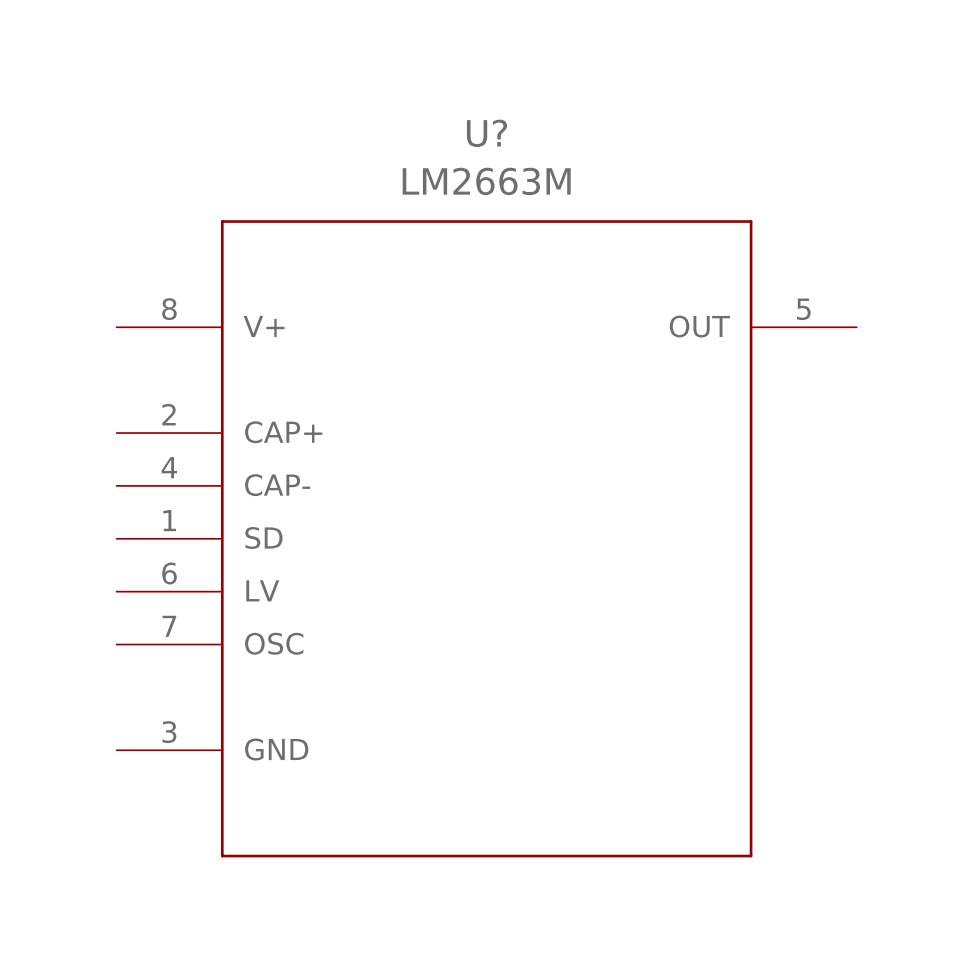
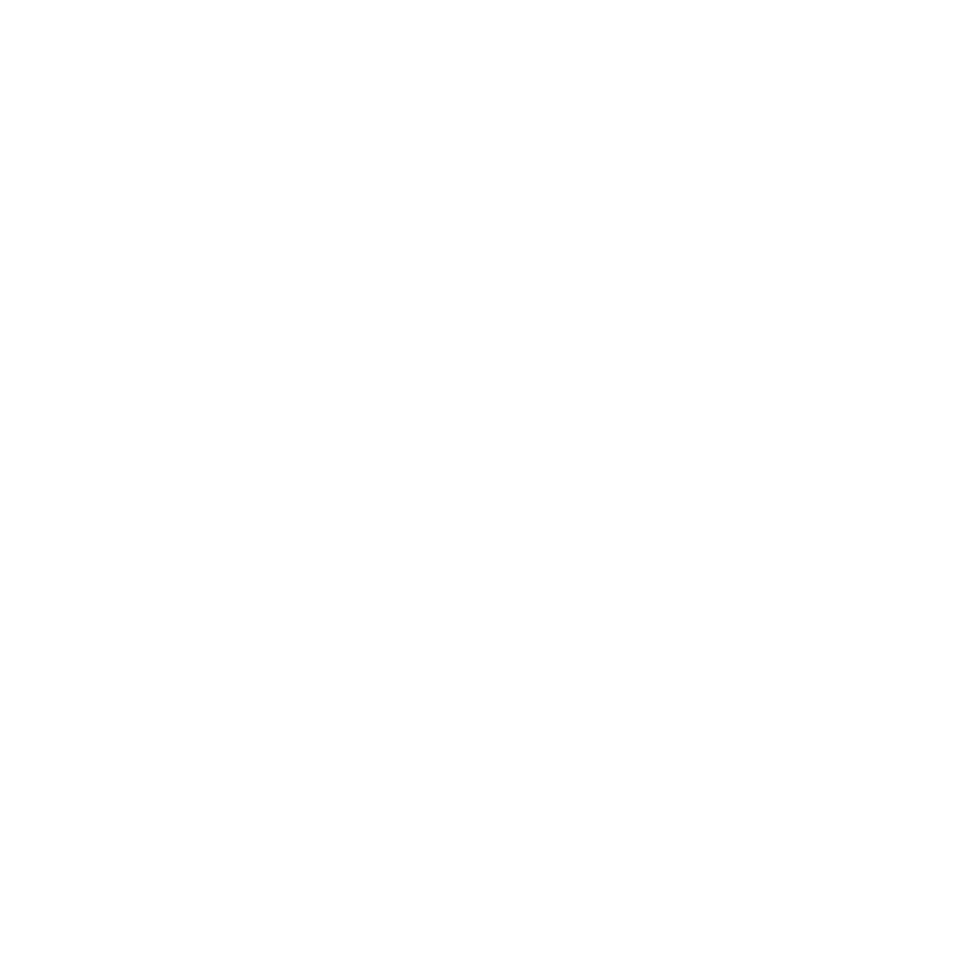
U?: LM2663M (486, 538) -> none

